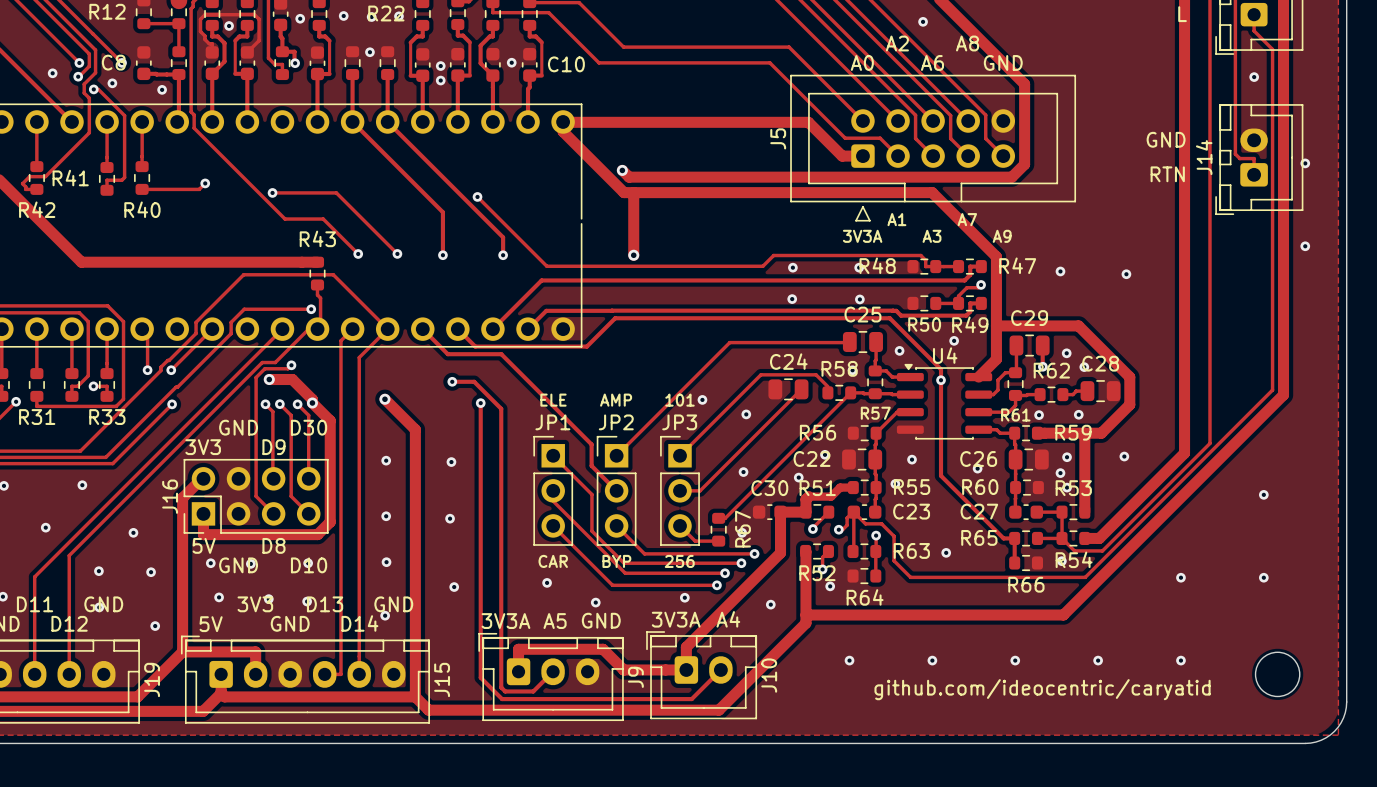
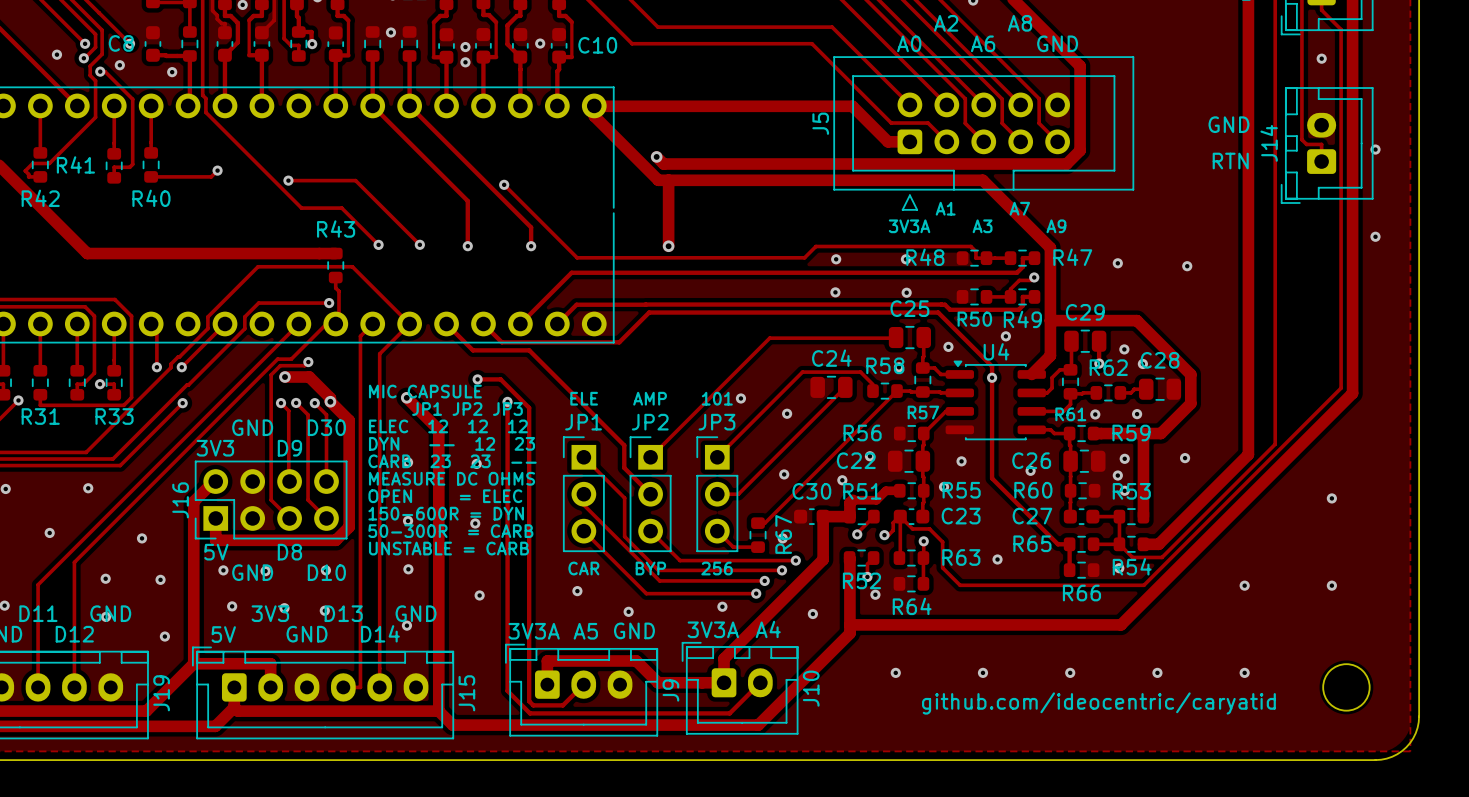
text: none -> MIC CAPSULE (425, 391)
text: none -> JP1 JP2 JP3 (467, 408)
text: none -> ELEC 12 12 12 (448, 426)
text: none -> DYN -- 12 23 (452, 443)
text: none -> CARB 23 23 -- (452, 461)
text: none -> MEASURE DC OHMS (452, 478)
text: none -> OPEN = ELEC (445, 496)
text: none -> 150-600R = DYN (446, 513)
text: none -> 50-300R = CARB (450, 531)
text: none -> UNSTABLE = CARB (448, 548)

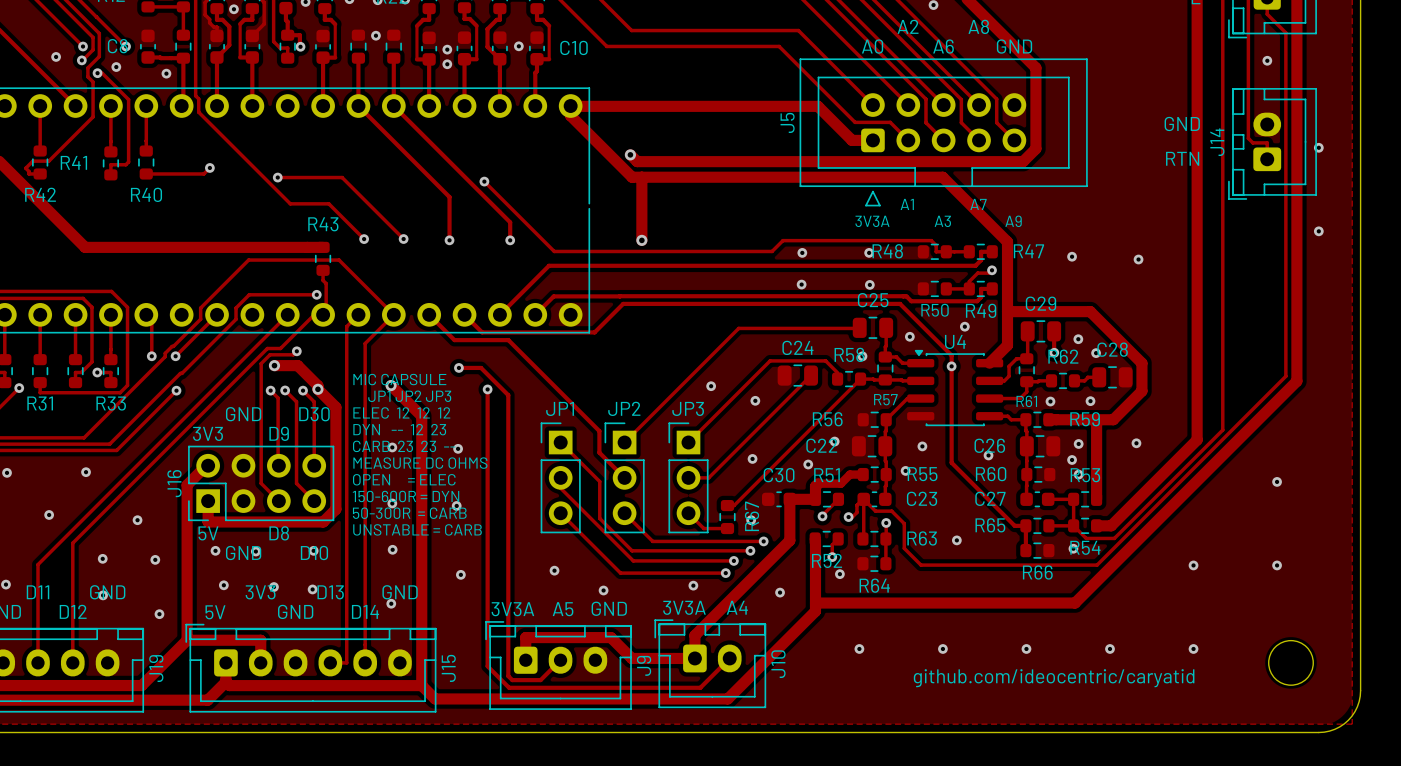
text: ELE (584, 398) -> none
text: AMP (650, 398) -> none
text: 101 (717, 398) -> none
text: CAR (583, 568) -> none
text: BYP (650, 568) -> none
text: 256 (717, 568) -> none

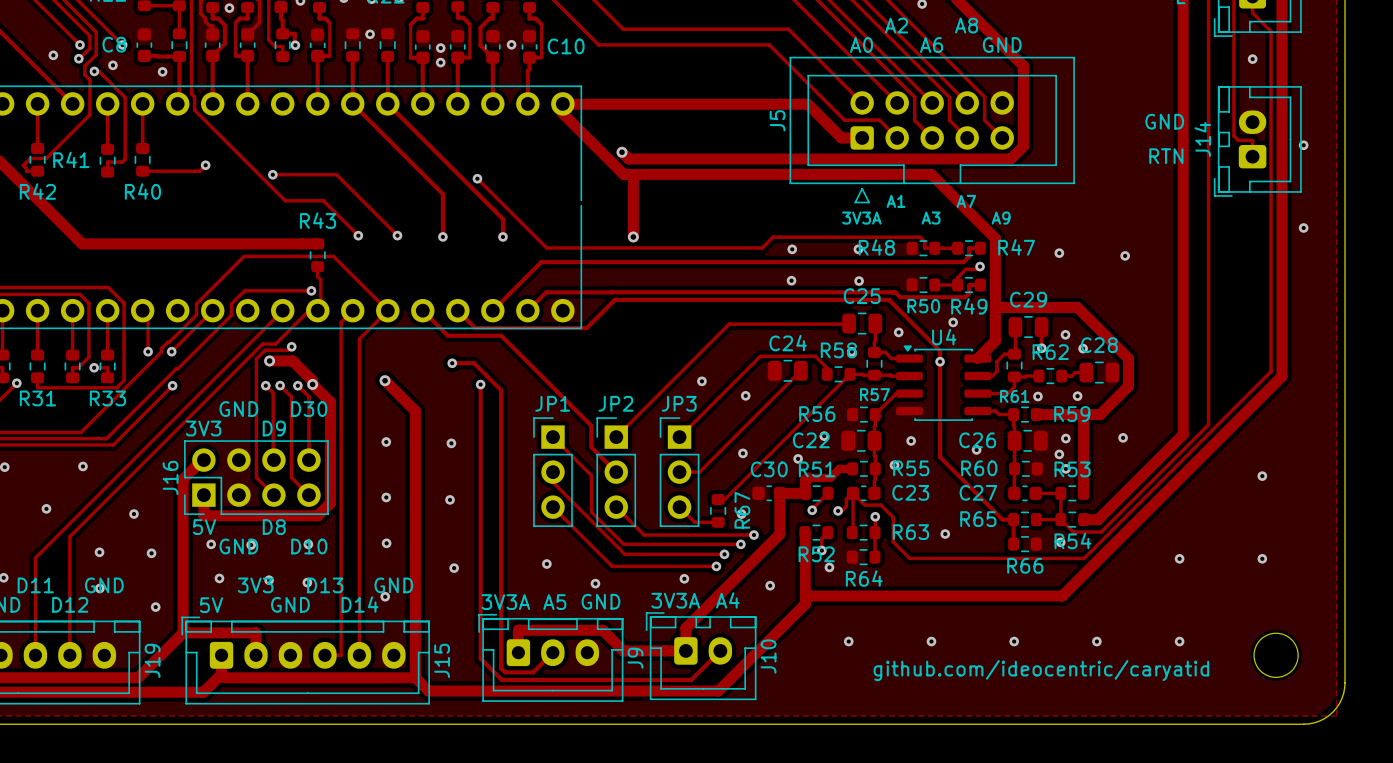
text: MIC CAPSULE (399, 379) -> none
text: JP1 JP2 JP3 (409, 396) -> none
text: ELEC 12 12 12 (401, 412) -> none
text: DYN -- 12 23 (399, 429) -> none
text: CARB 23 23 -- (404, 446) -> none
text: MEASURE DC OHMS (420, 463) -> none
text: OPEN = ELEC (404, 479) -> none
text: 150-600R = DYN (406, 496) -> none
text: 50-300R = CARB (409, 513) -> none
text: UNSTABLE = CARB (417, 529) -> none

